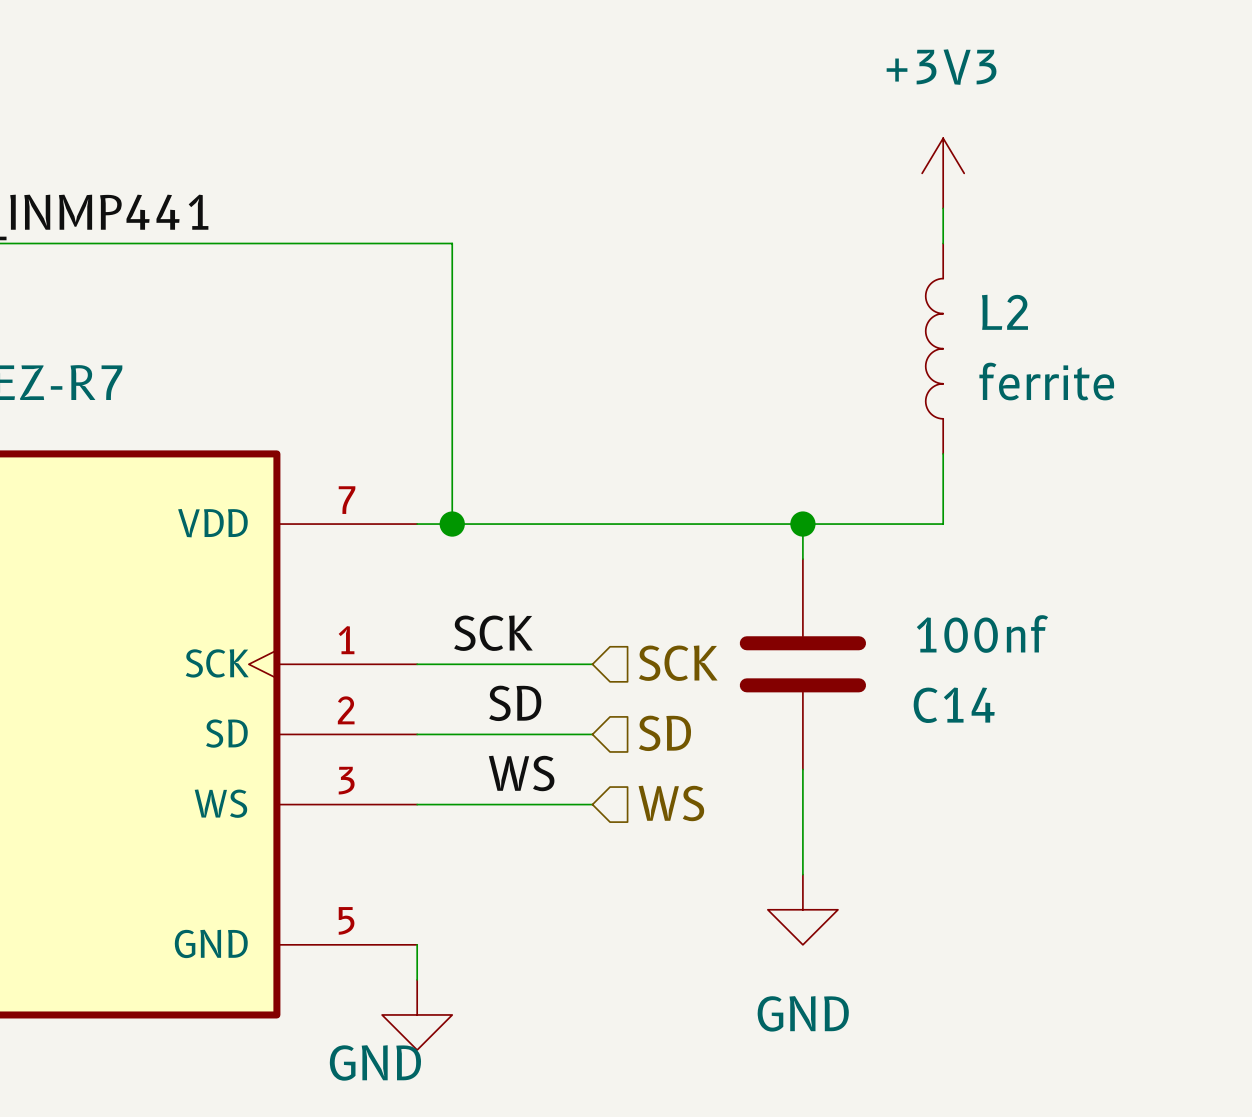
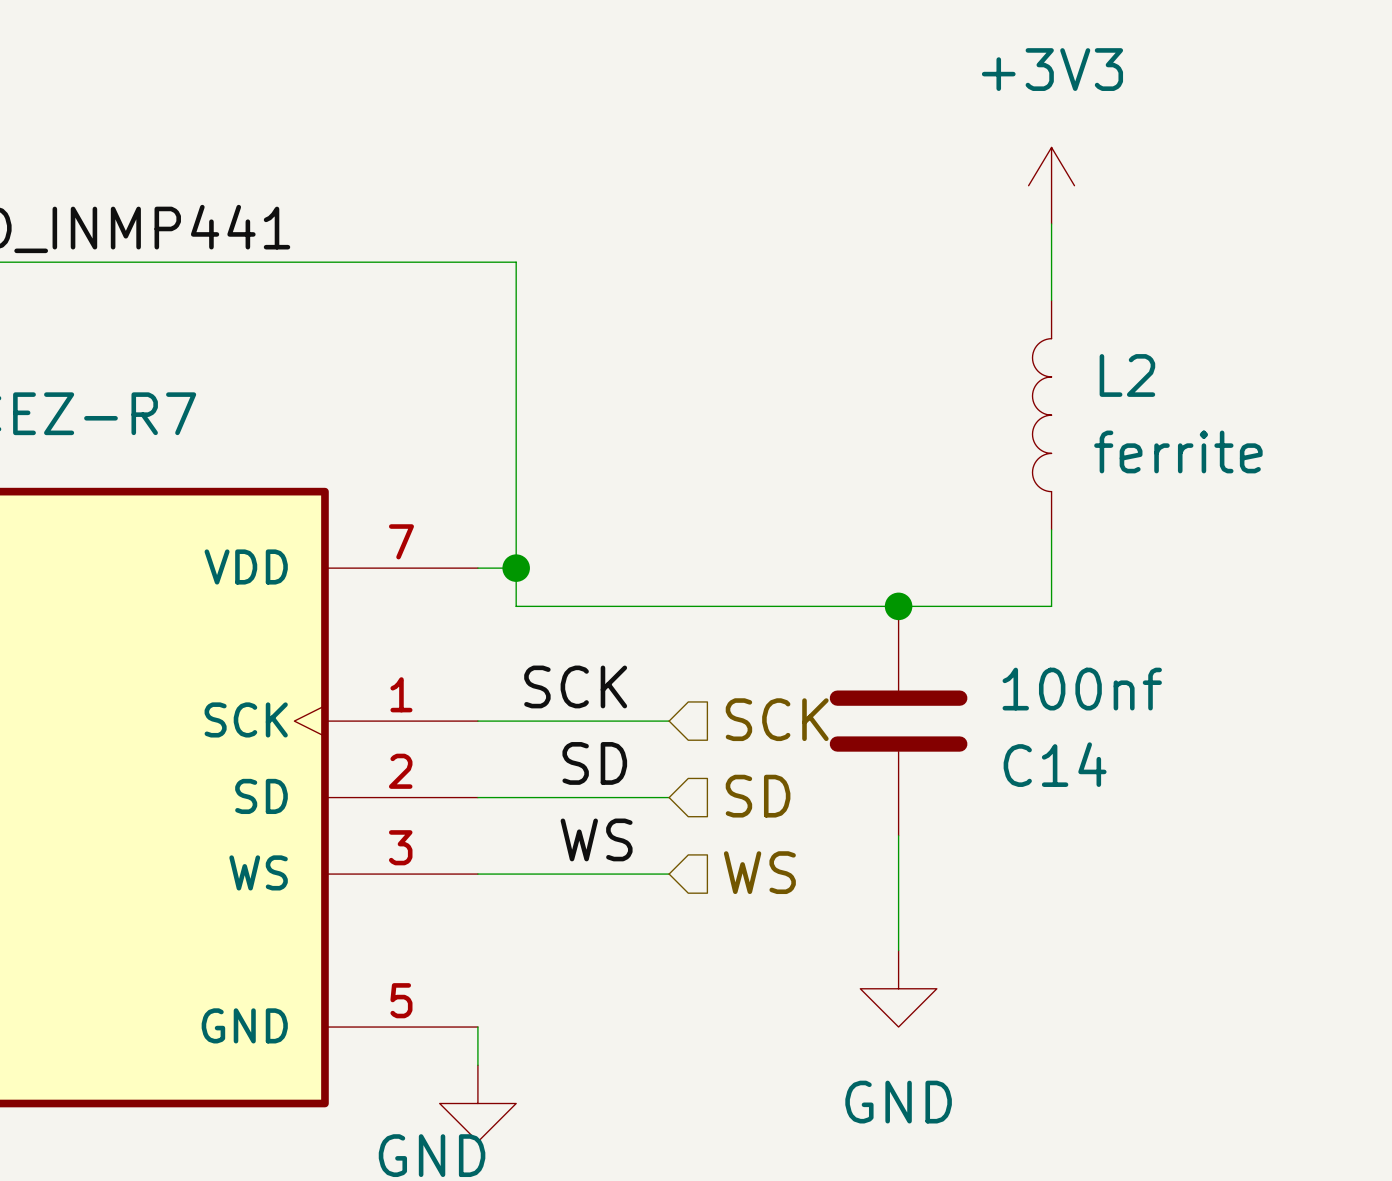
L2 position: (934, 348) -> (1042, 415)
wire: (452, 524) (943, 524) -> (516, 568) (516, 606) (1051, 606) (1051, 568)
wire: (802, 524) (802, 559) -> none
junction position: (802, 524) -> (898, 606)

